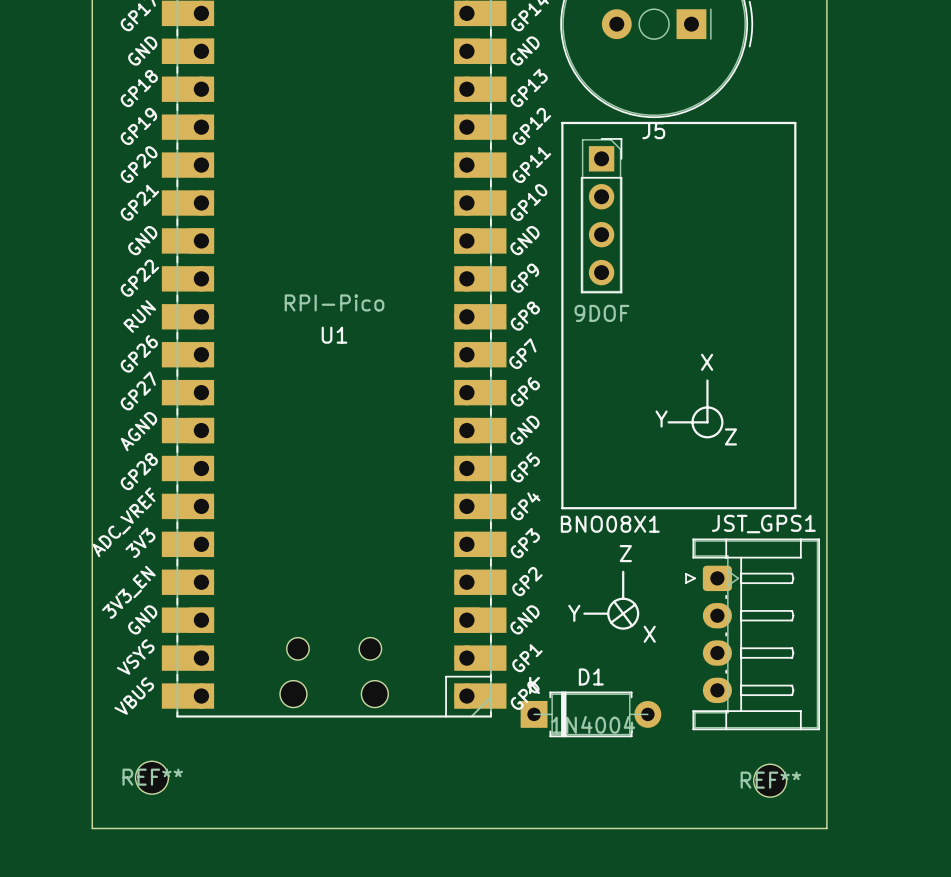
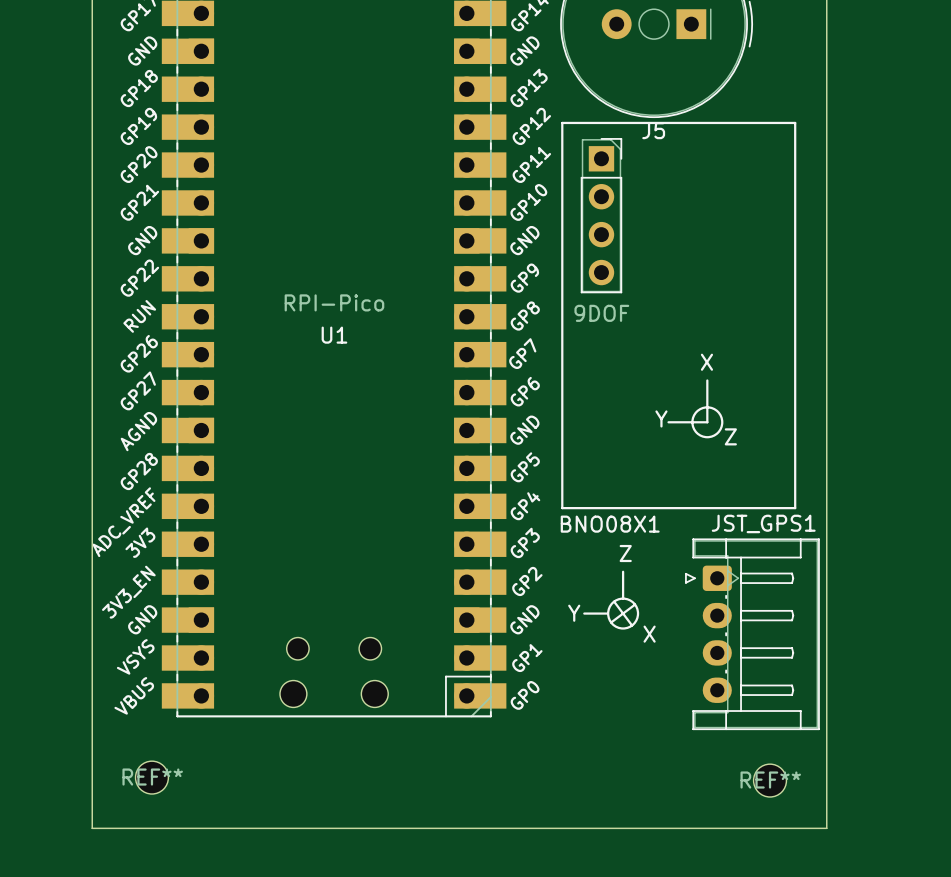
D1: 1N4004 (590, 714) -> none

